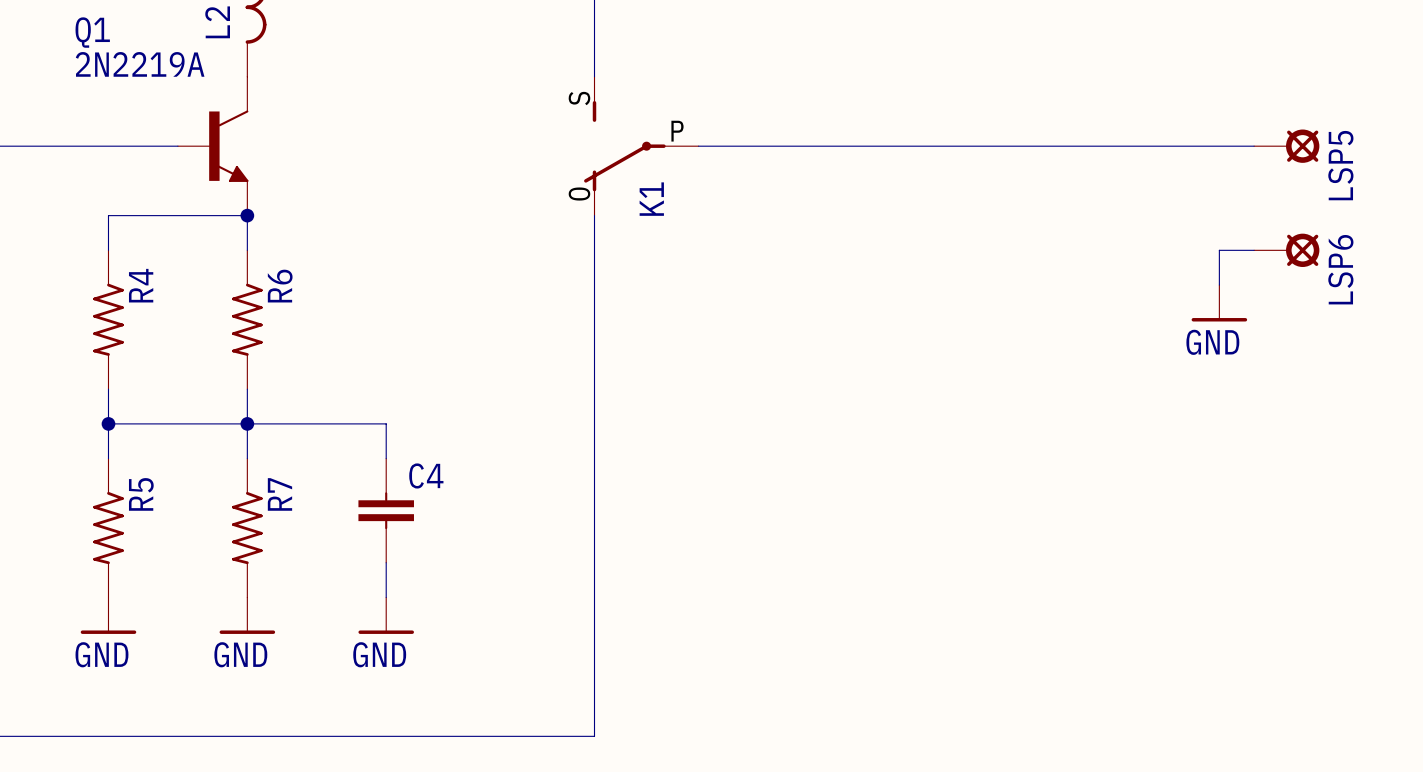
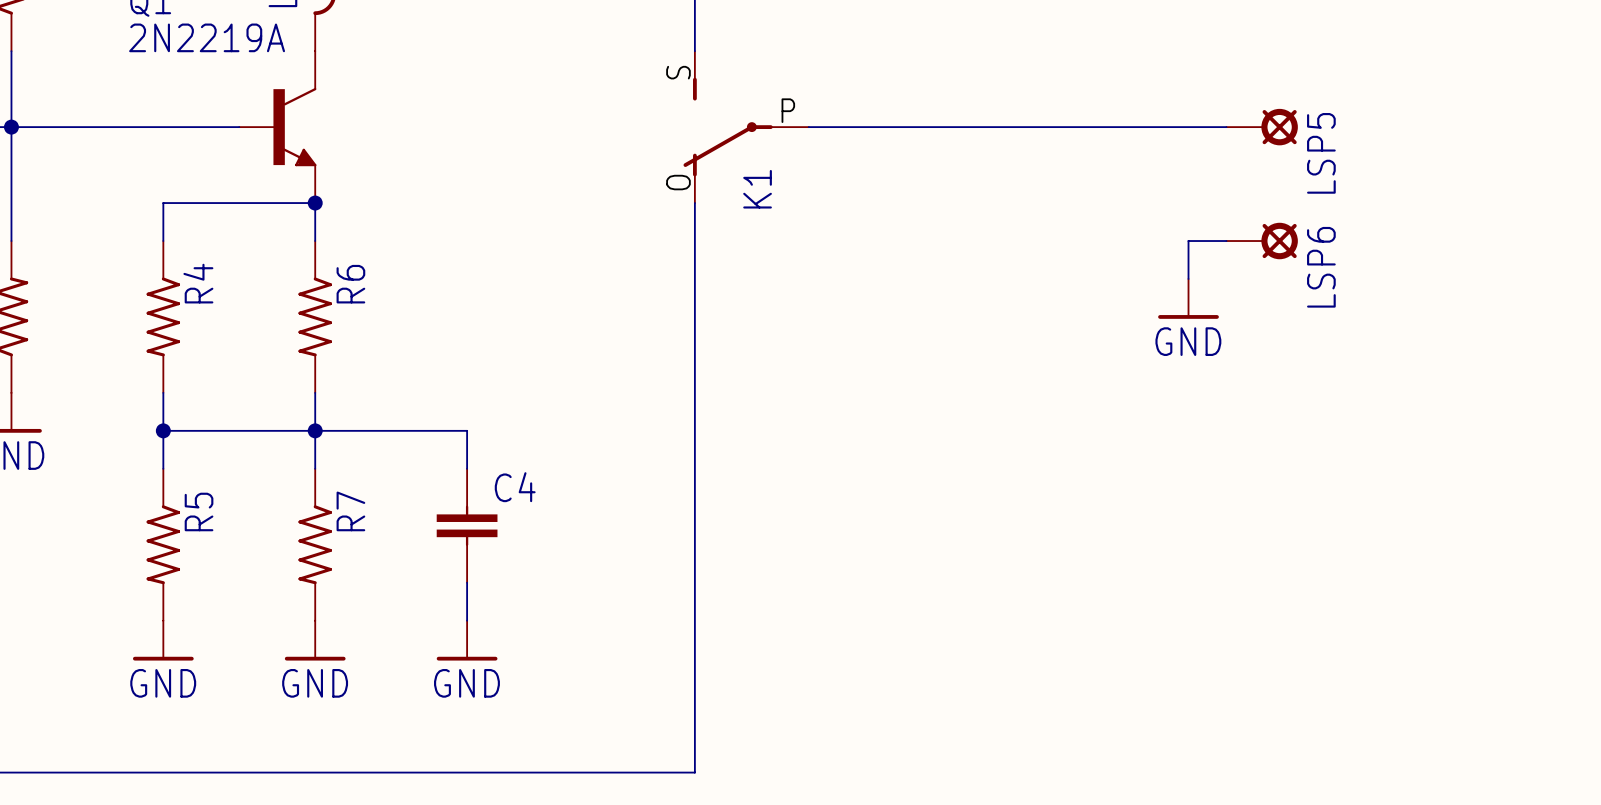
wire: (1080, 146) (1254, 146) -> none
LSP5 position: (1286, 146) -> (1262, 127)
wire: (1254, 250) (1219, 250) (1219, 285) -> (1226, 241) (1188, 241) (1188, 278)
LSP6 position: (1286, 250) -> (1262, 241)
power symbol position: GND (1219, 303) -> GND (1188, 298)

